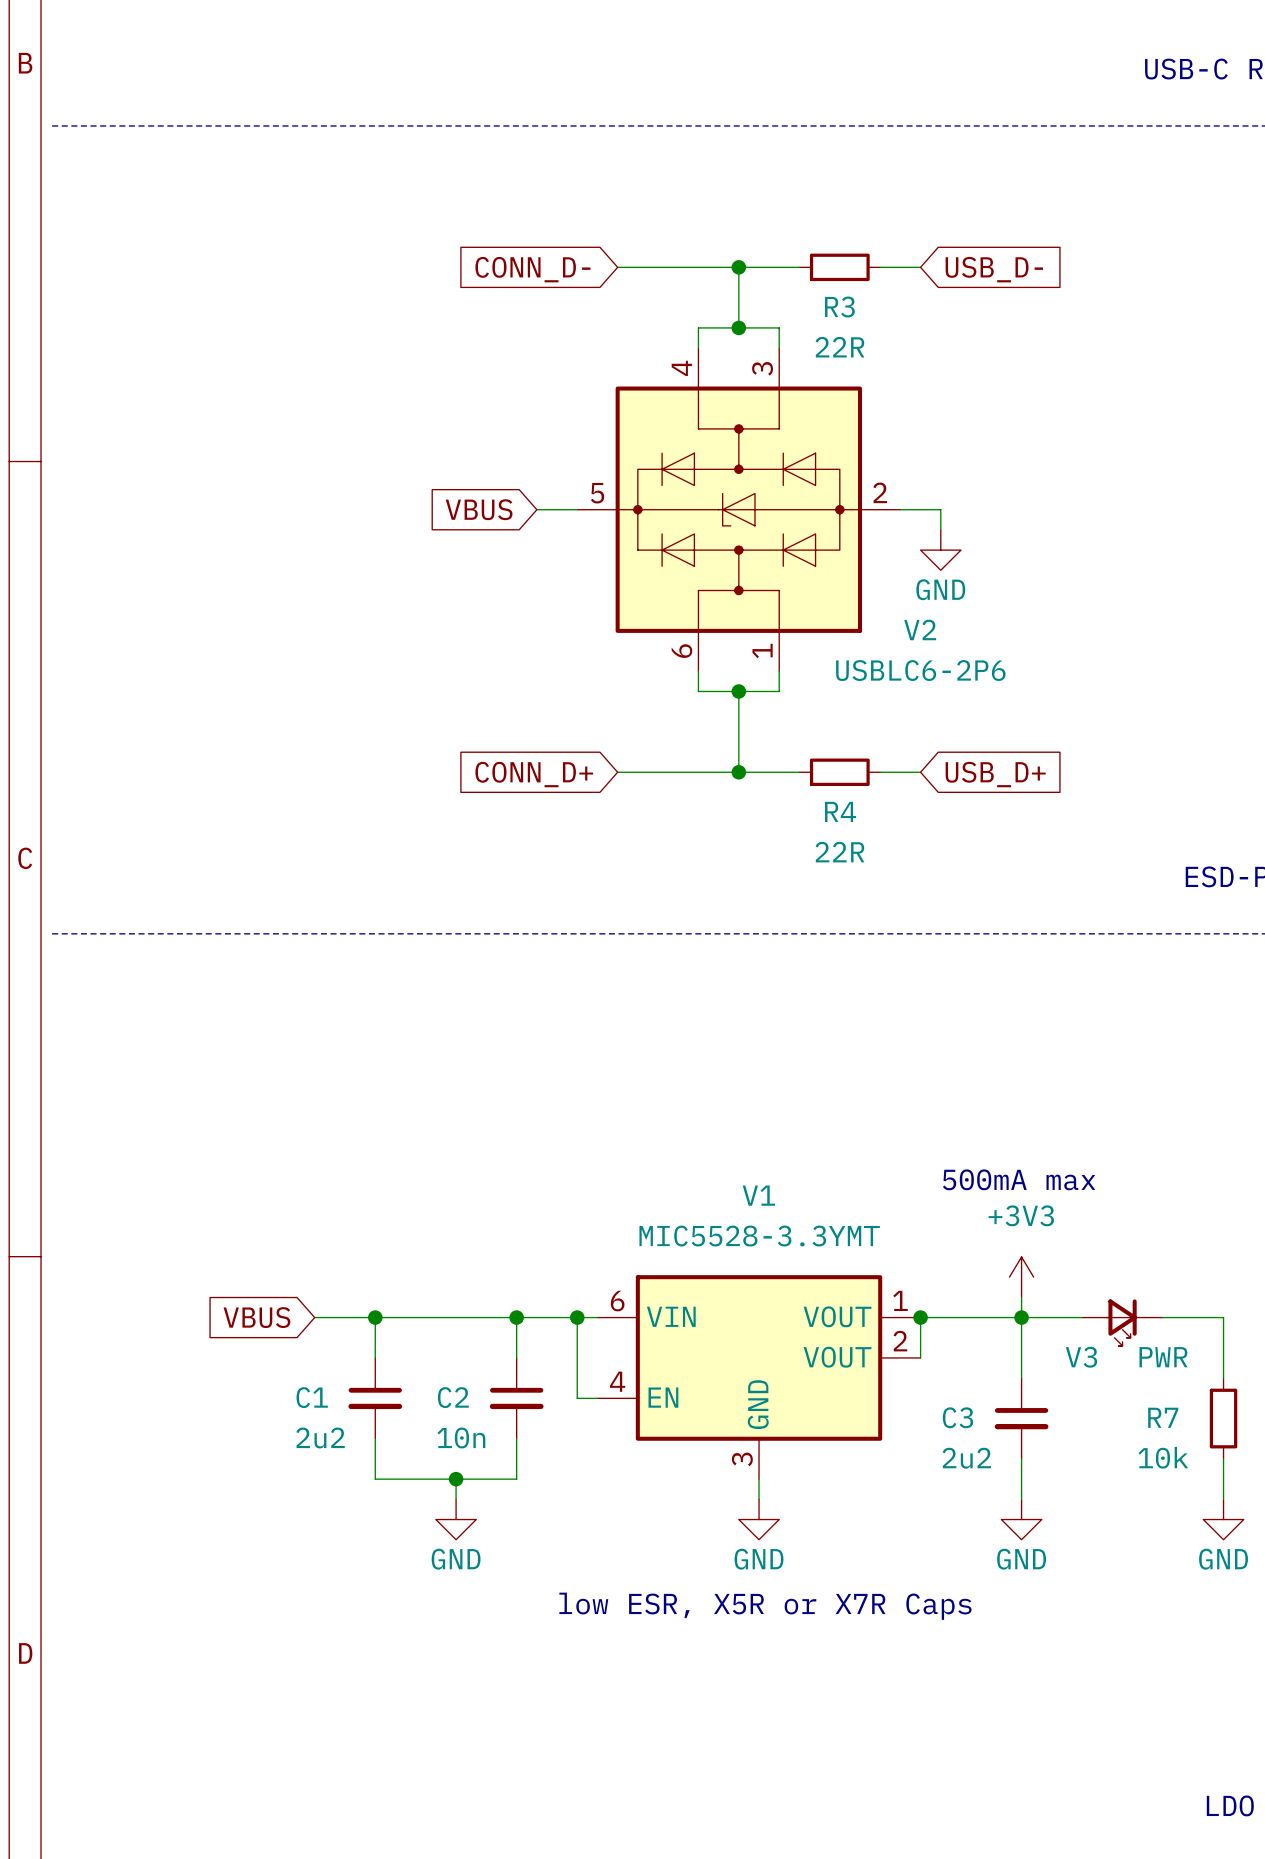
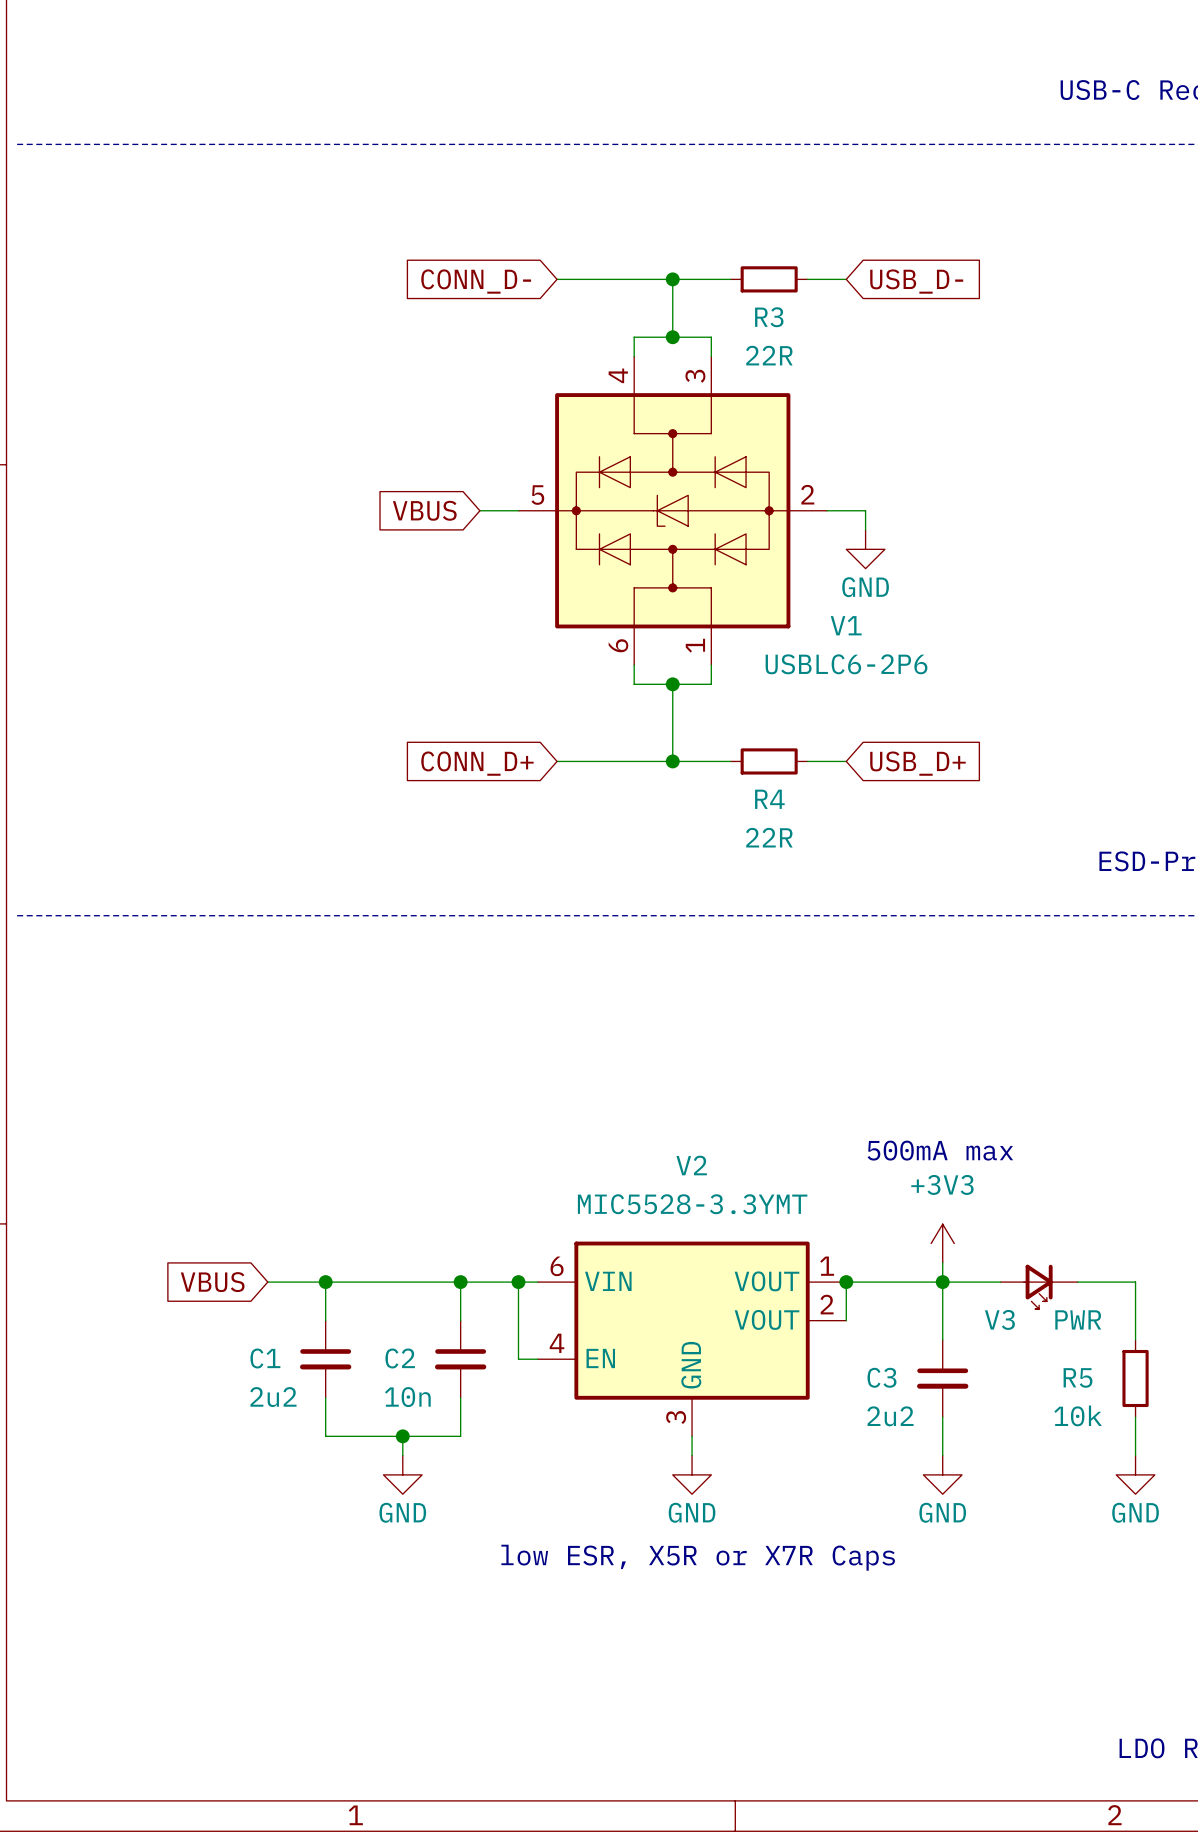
V2 name: V2 (920, 629) -> V1 (846, 625)
V1 name: V1 (758, 1195) -> V2 (691, 1165)
R7 name: R7 (1163, 1417) -> R5 (1078, 1377)

